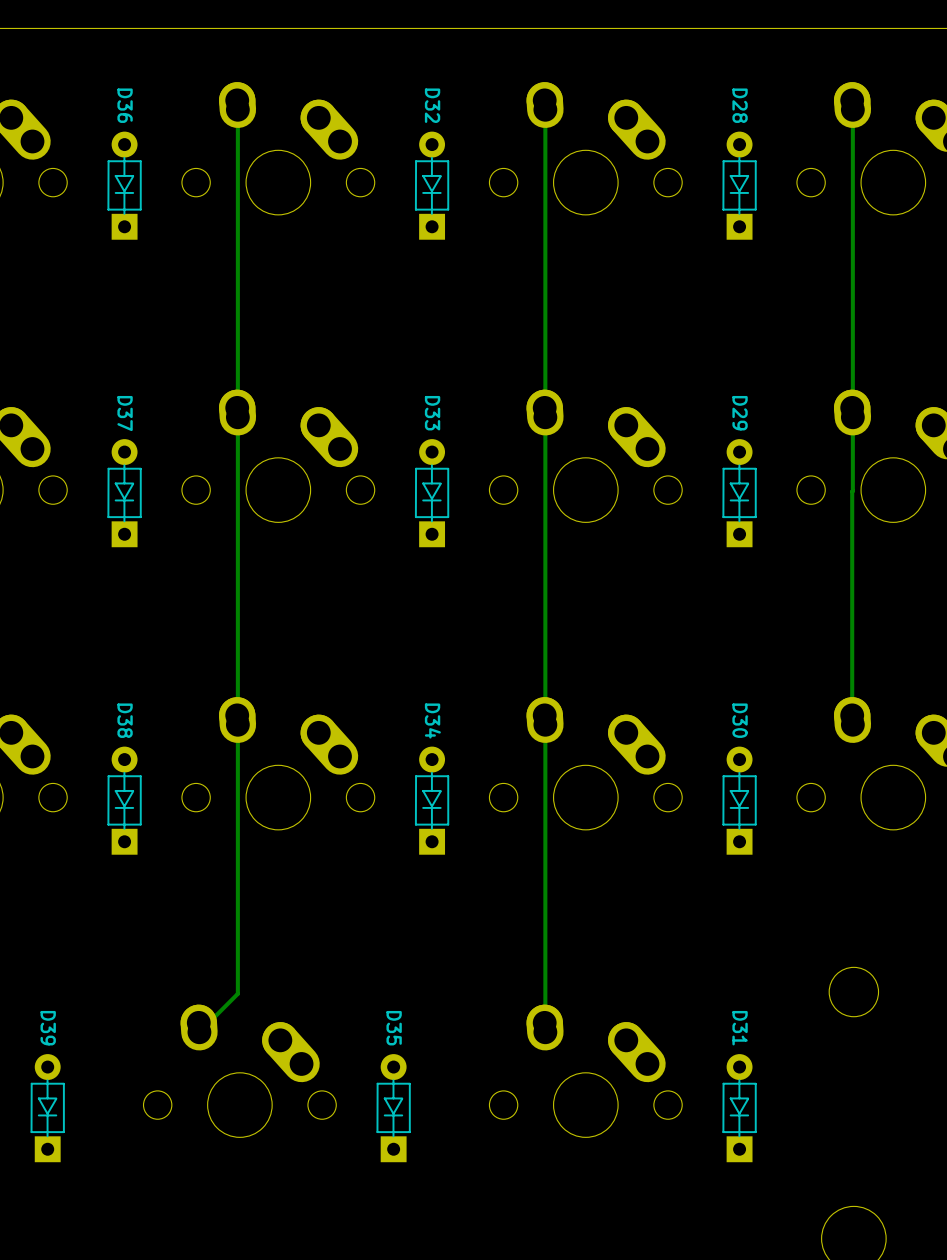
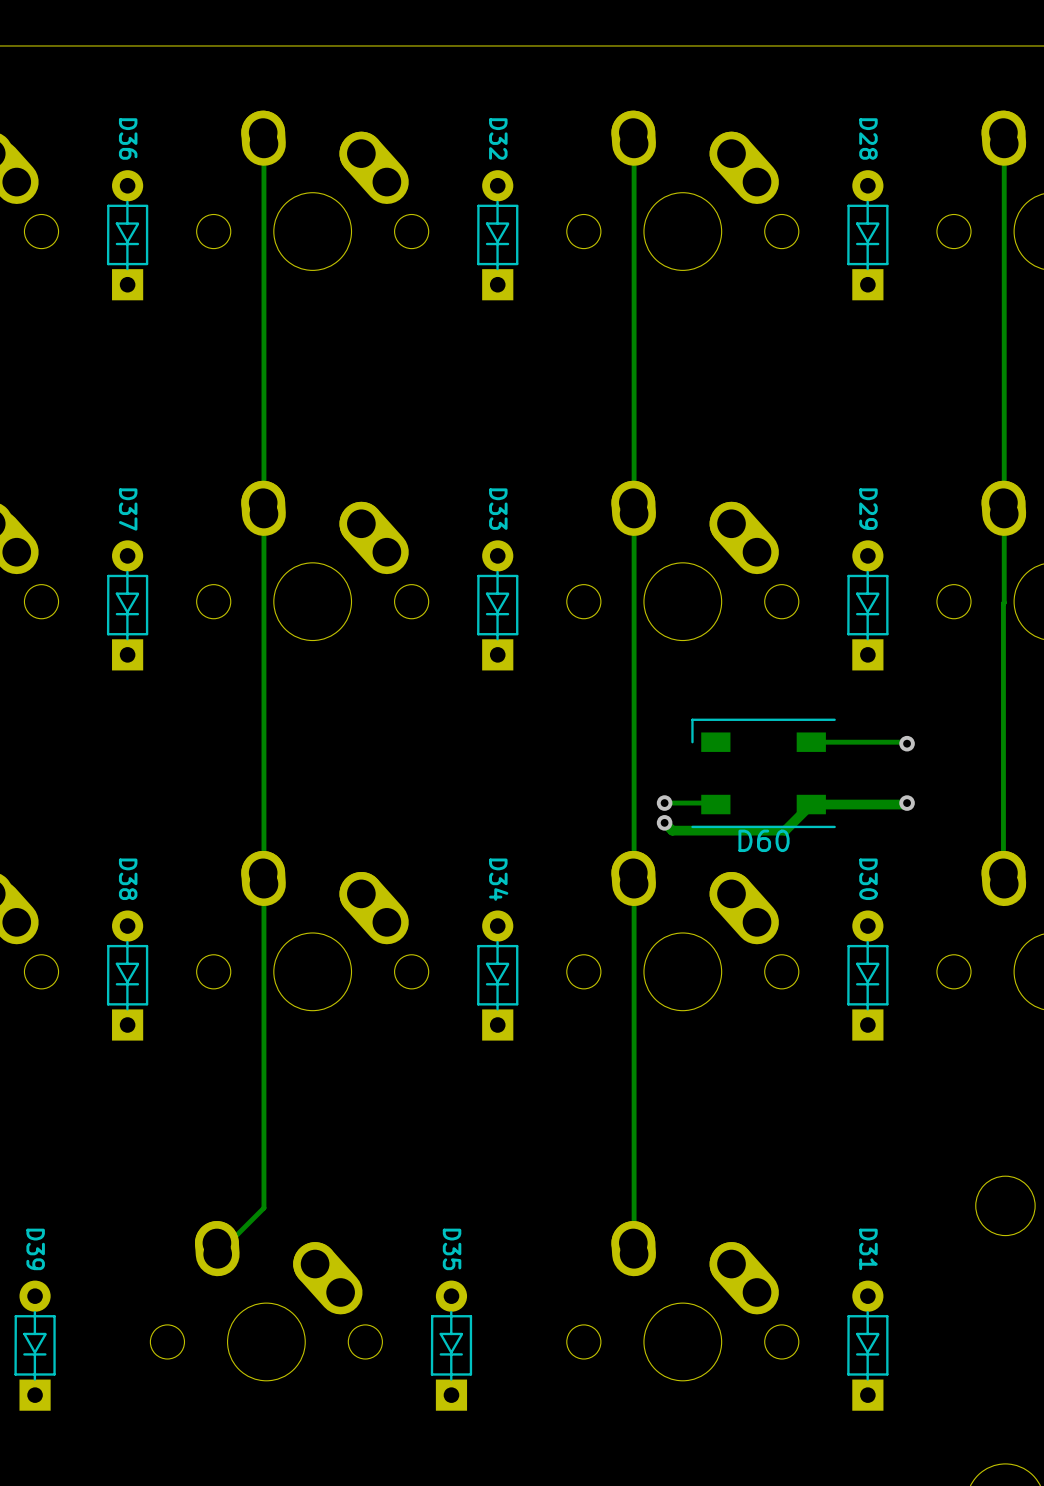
track: none -> (811, 742) (907, 743)
via: none -> (907, 743)
D60: none -> (763, 773)
track: none -> (664, 803) (715, 804)
via: none -> (664, 803)
track: none -> (907, 803) (811, 804) (785, 830) (672, 830) (664, 822)
via: none -> (907, 803)
via: none -> (664, 822)

